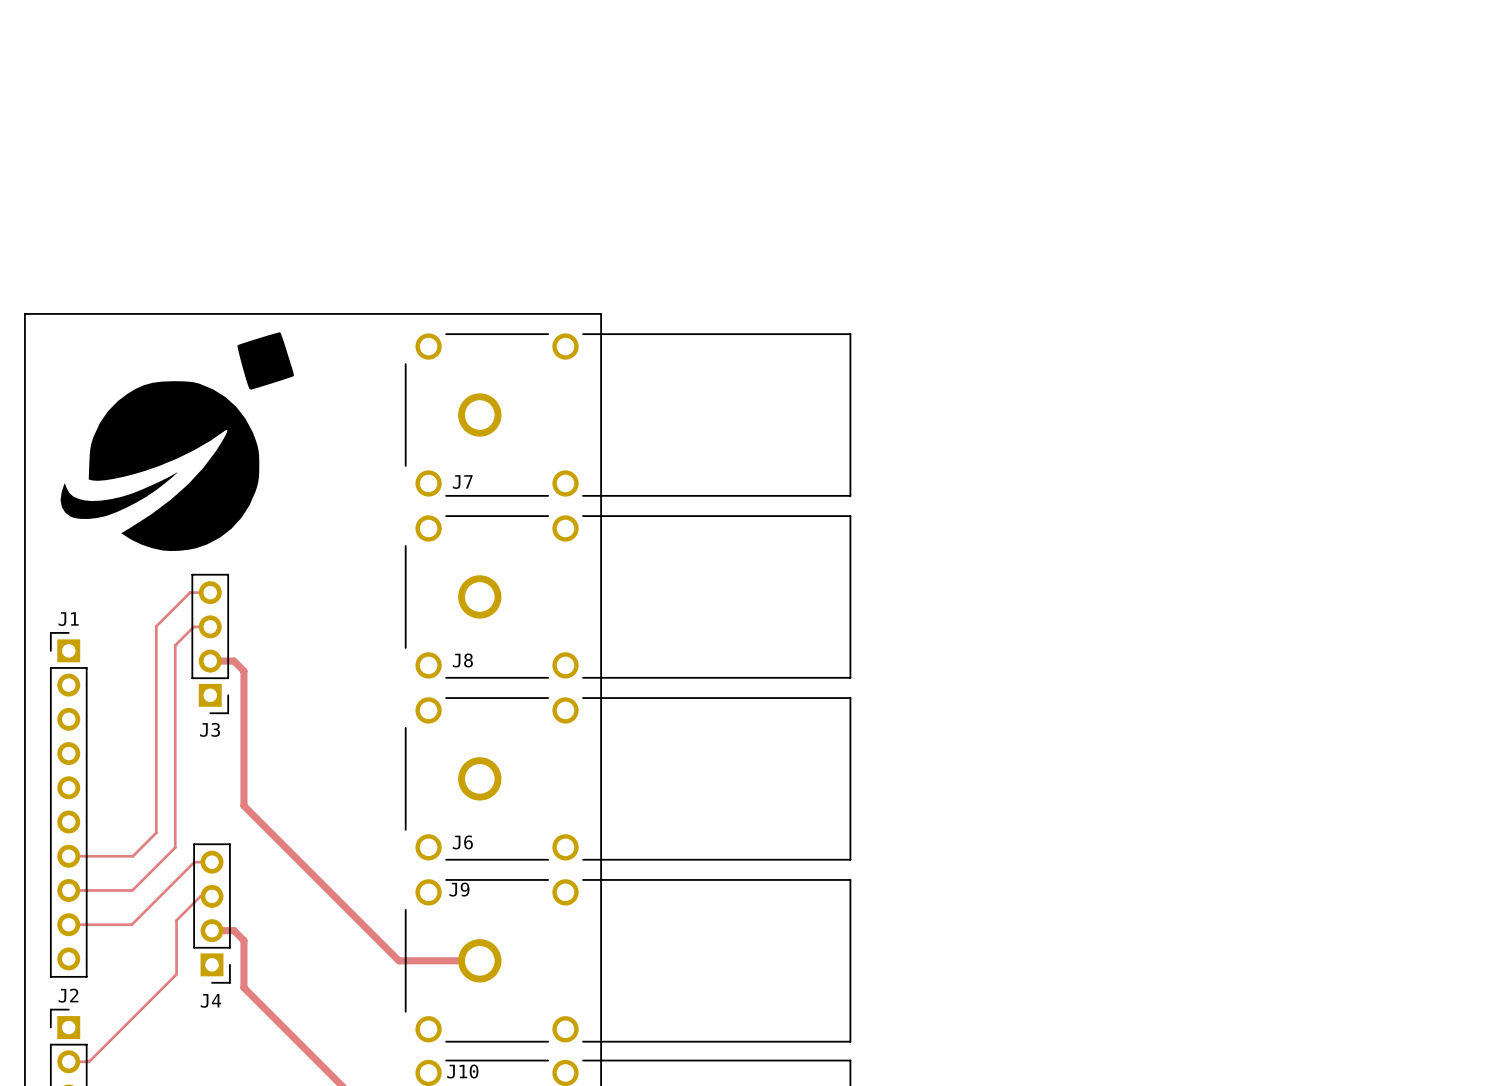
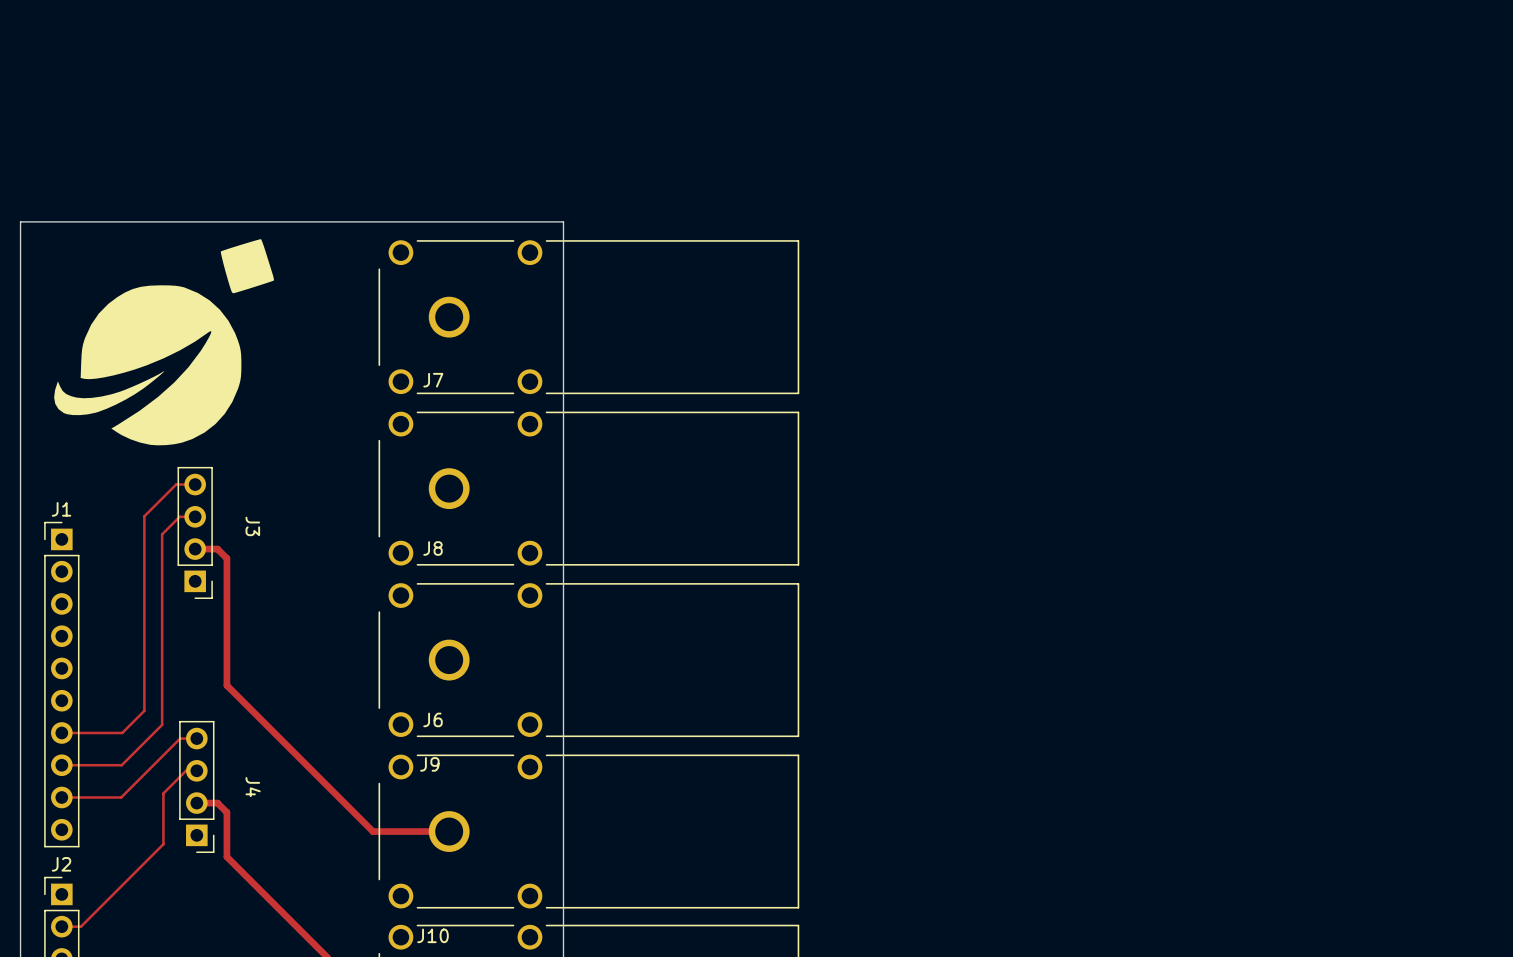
J3 name rotation: 0° (210, 729) -> 90° clockwise (252, 526)
J3 name position: J3 (210, 729) -> J3 (252, 526)
J4 name rotation: 0° (210, 1000) -> 90° clockwise (253, 787)
J4 name position: J4 (210, 1000) -> J4 (253, 787)

